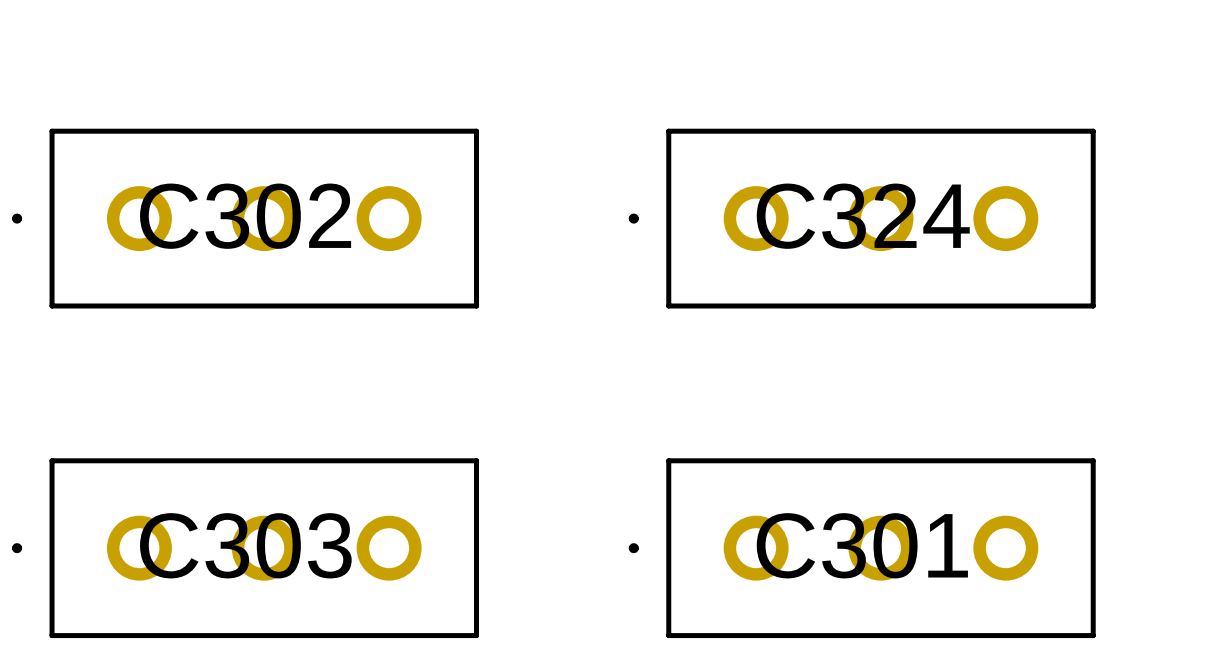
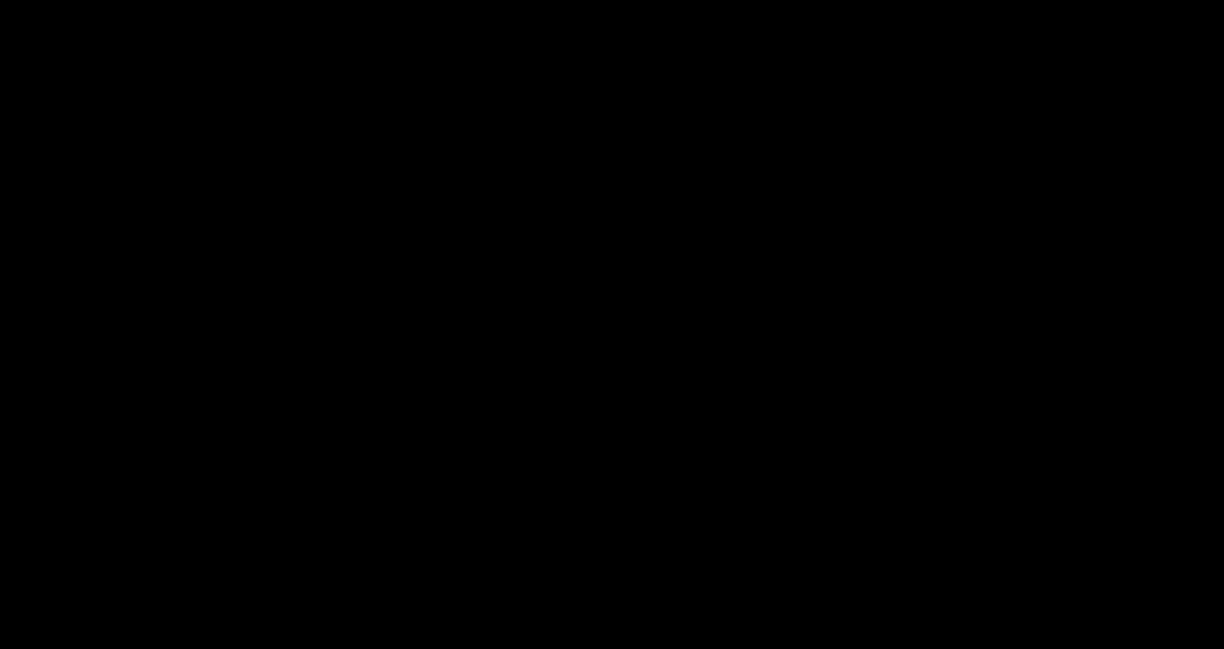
C302: (245, 218) -> none
C324: (862, 218) -> none
C303: (245, 548) -> none
C301: (862, 548) -> none

